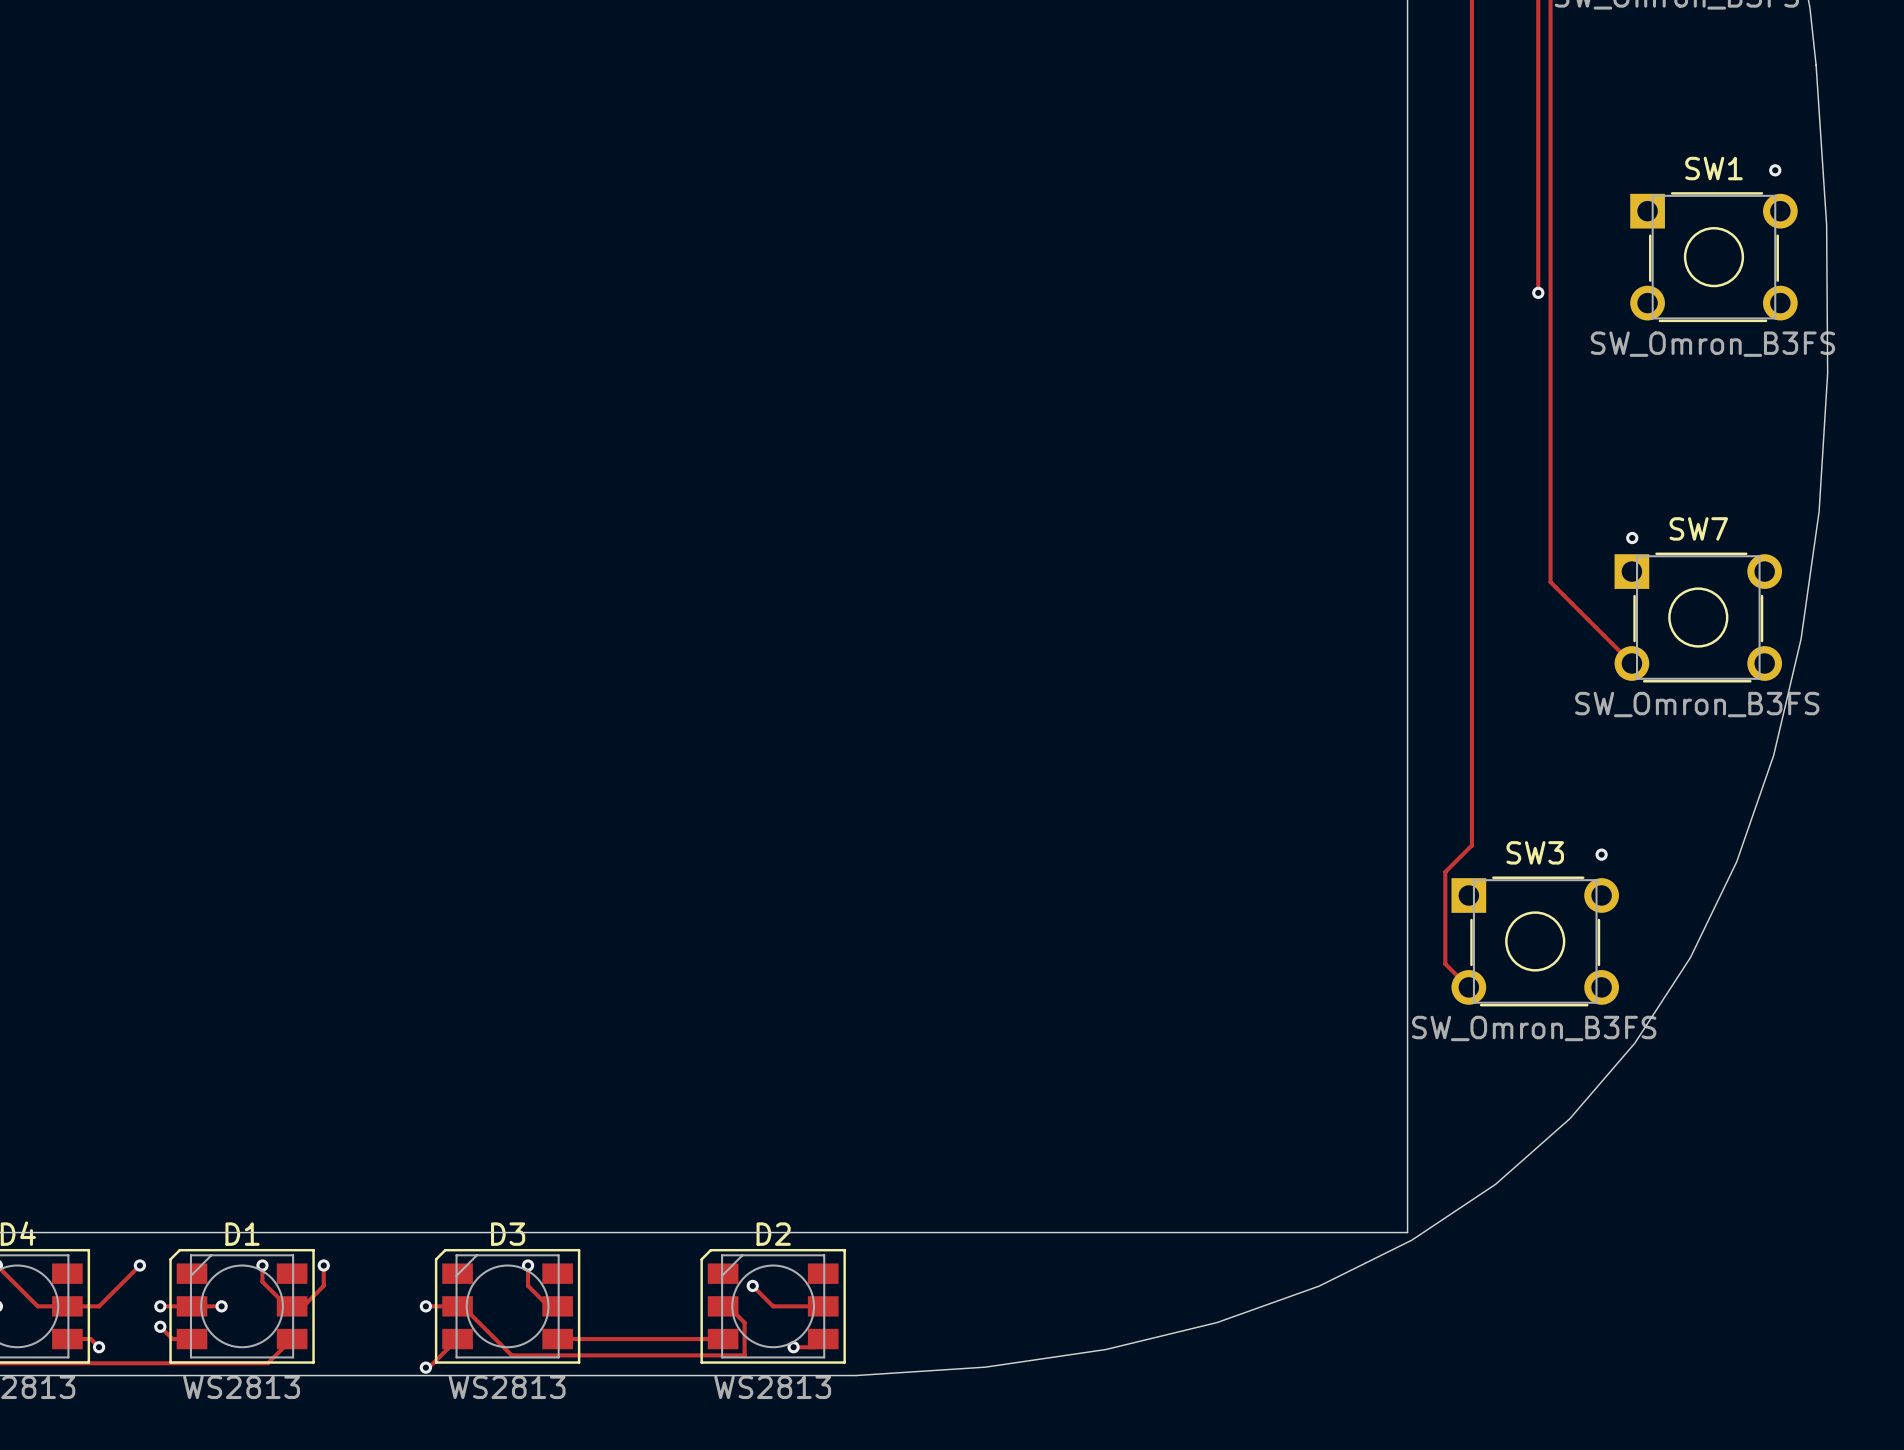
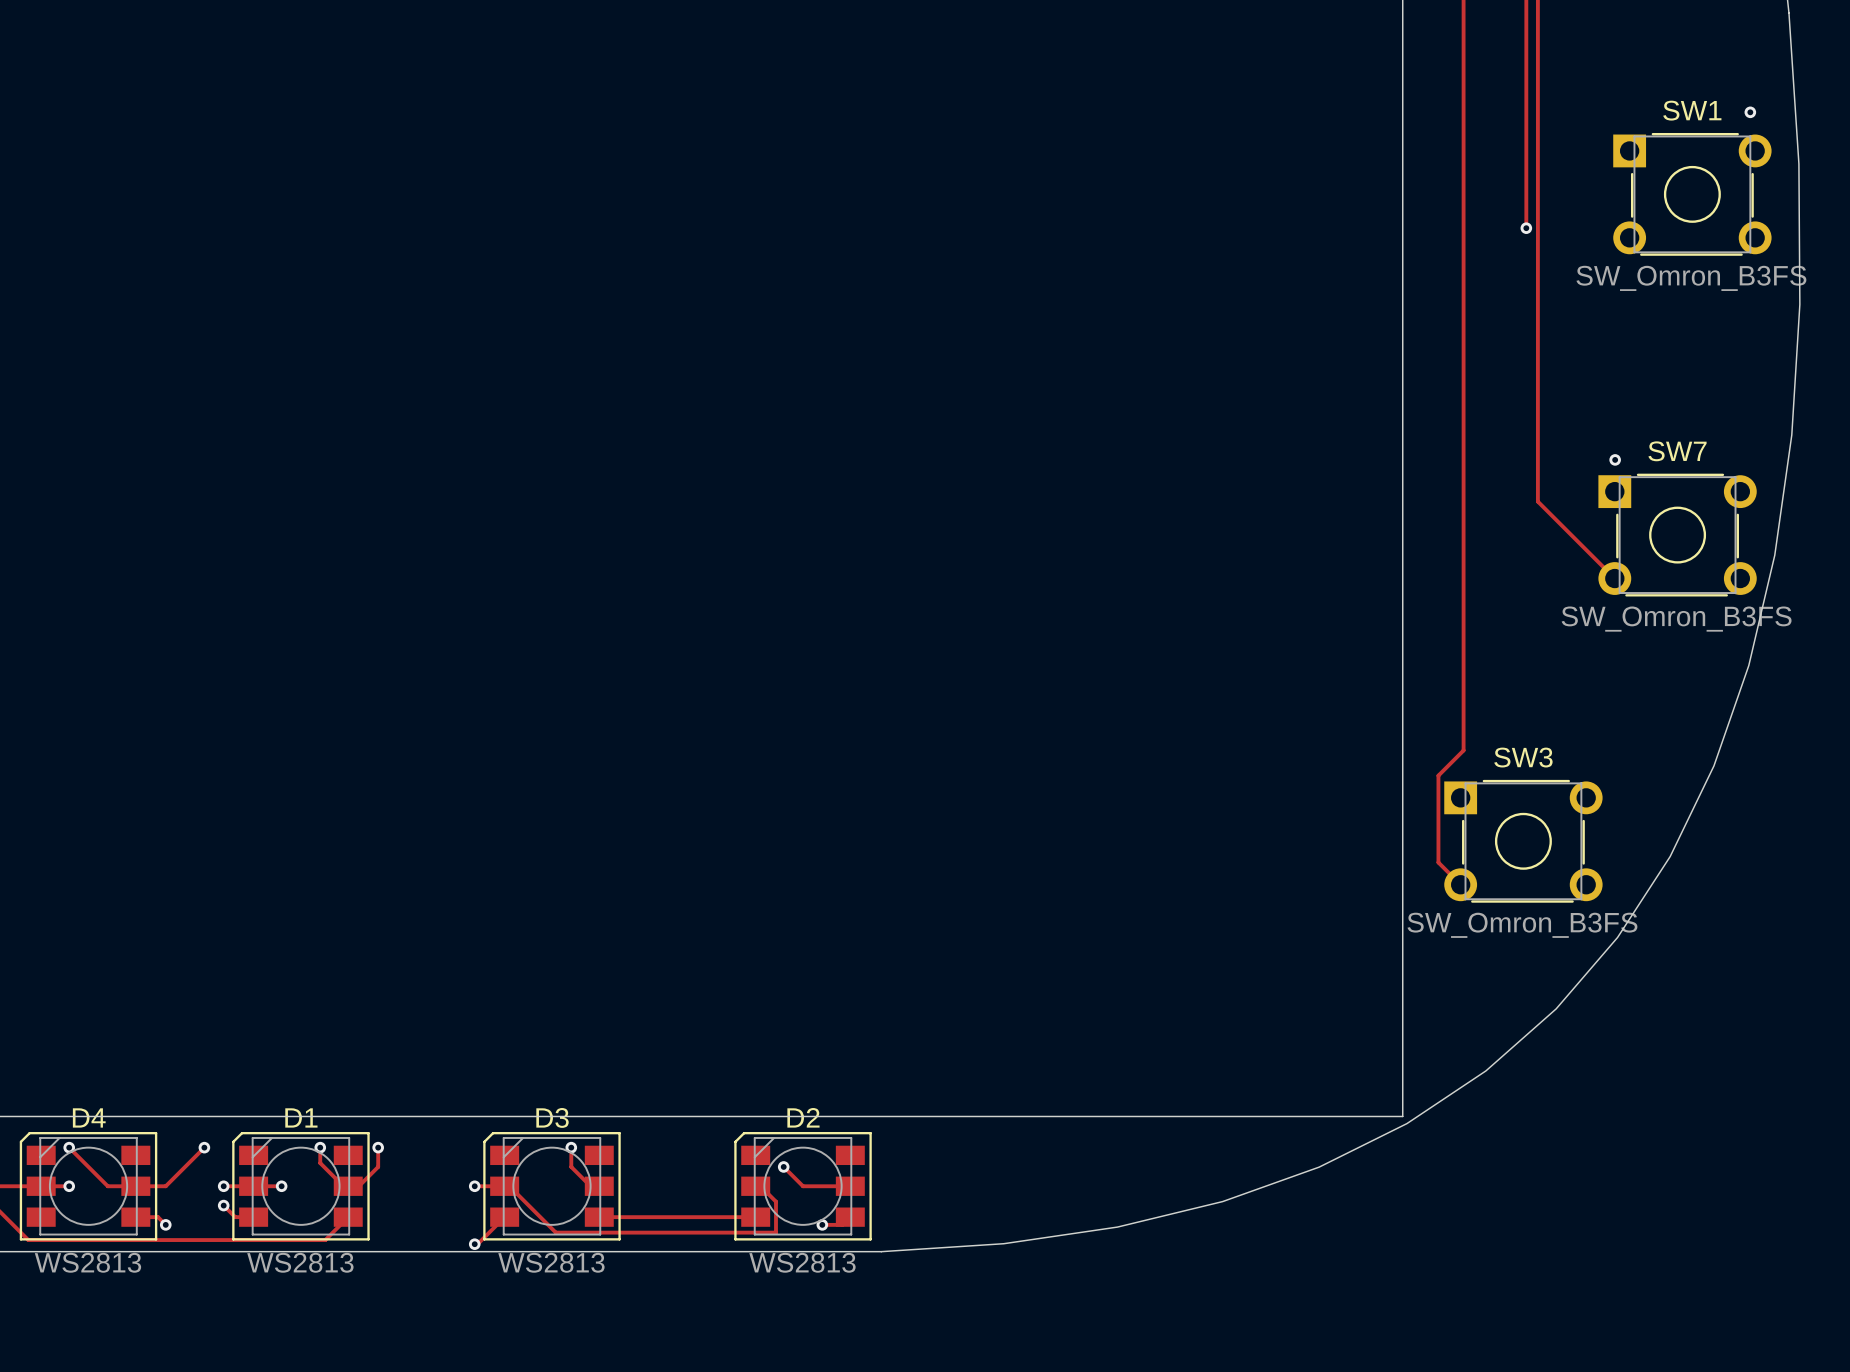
via: (1601, 854) -> none

